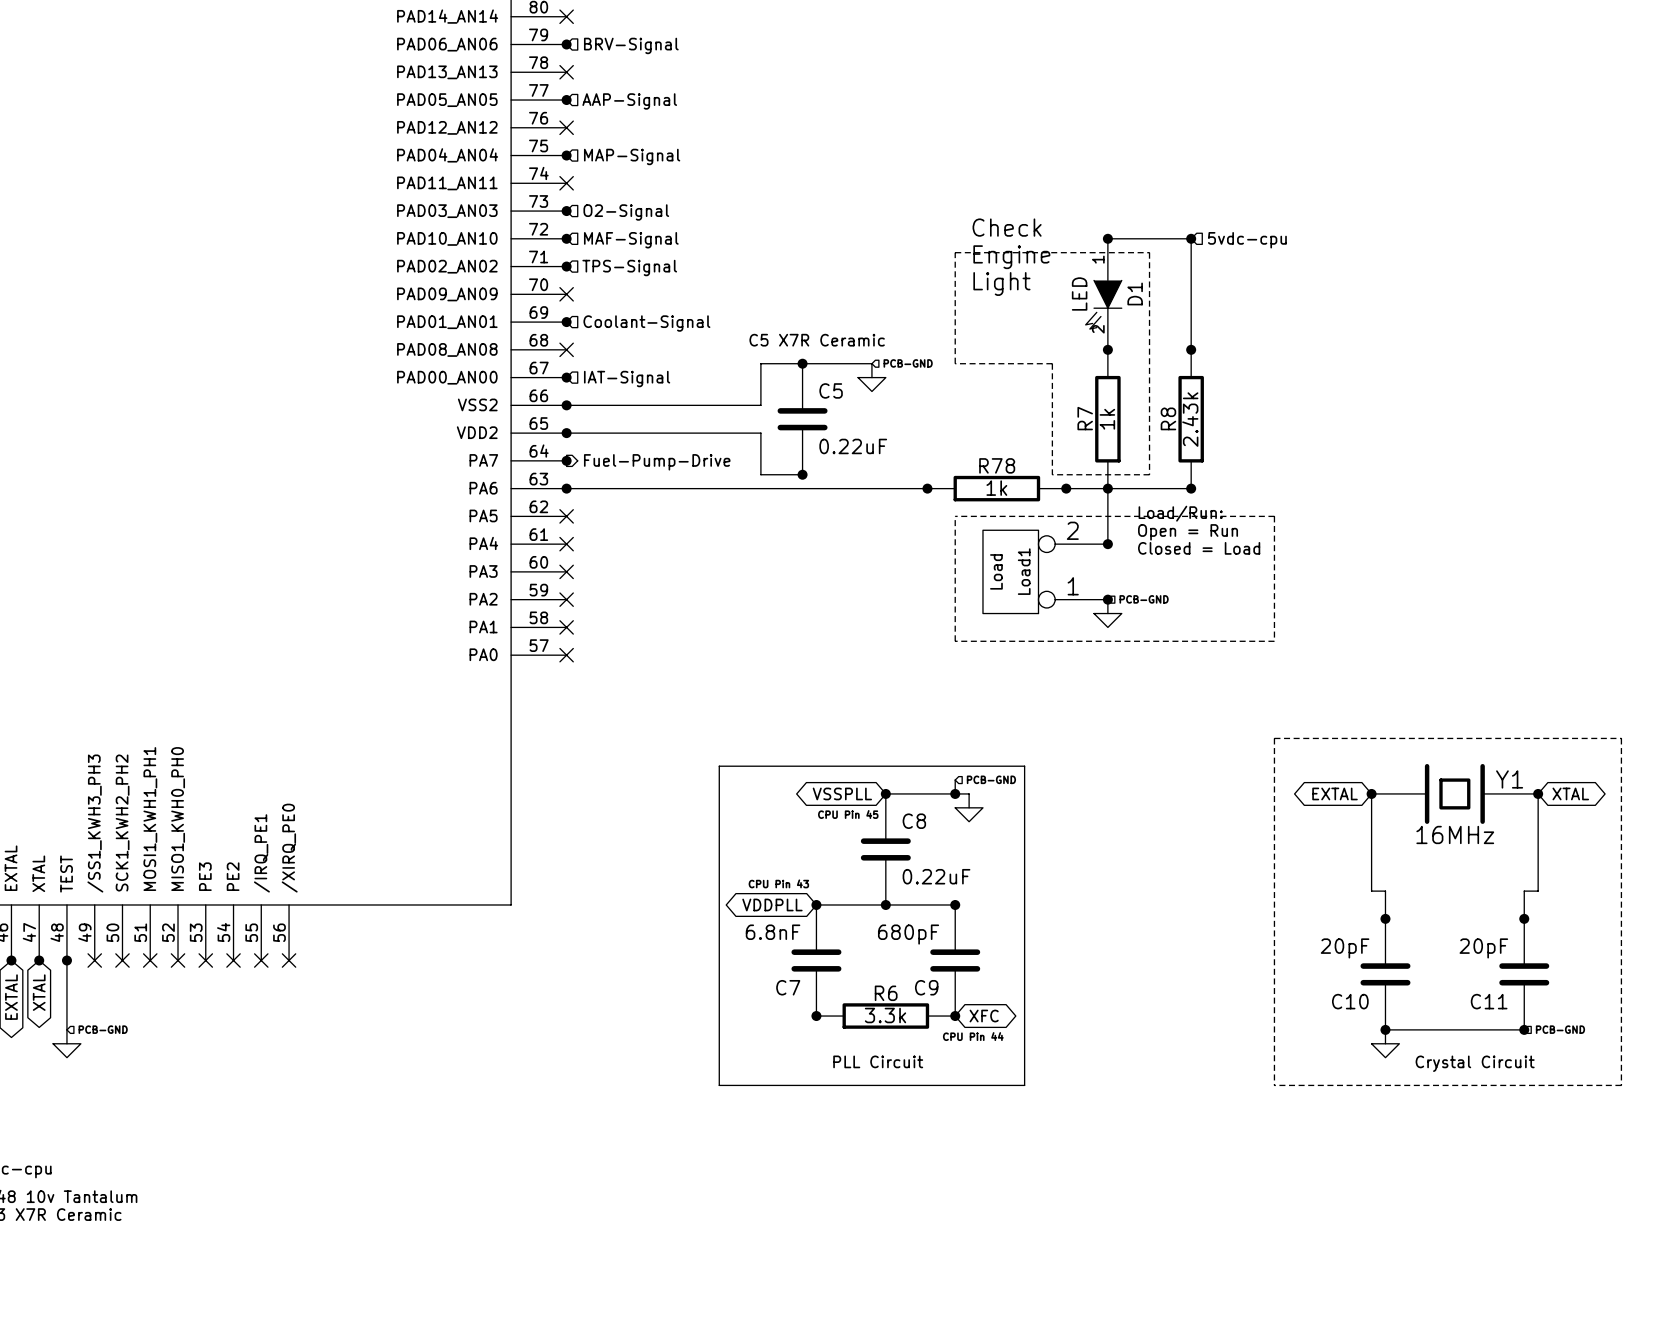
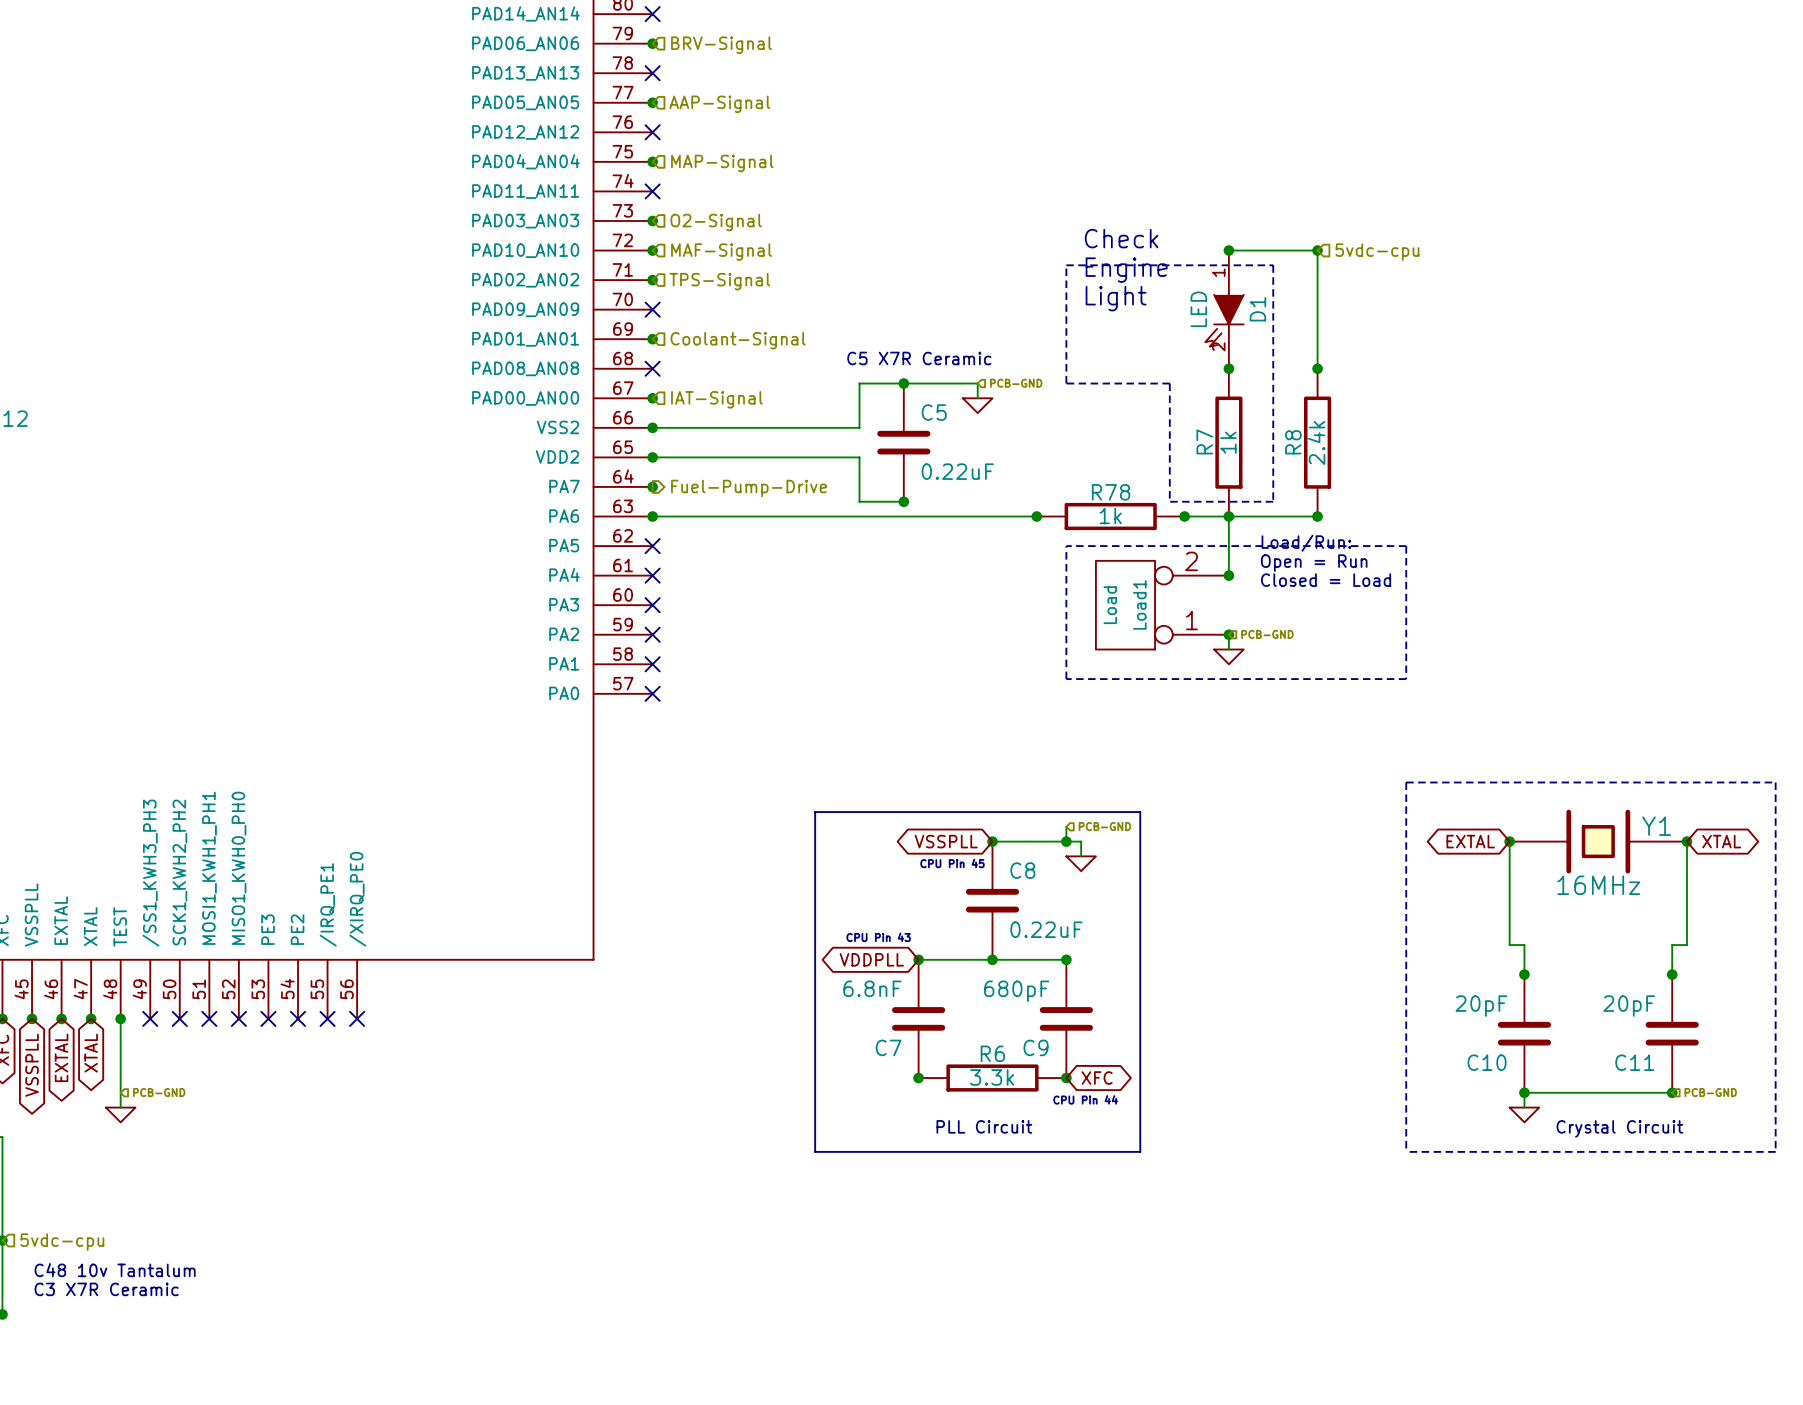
R8 value: 2.43k (1190, 419) -> 2.4k (1316, 442)

